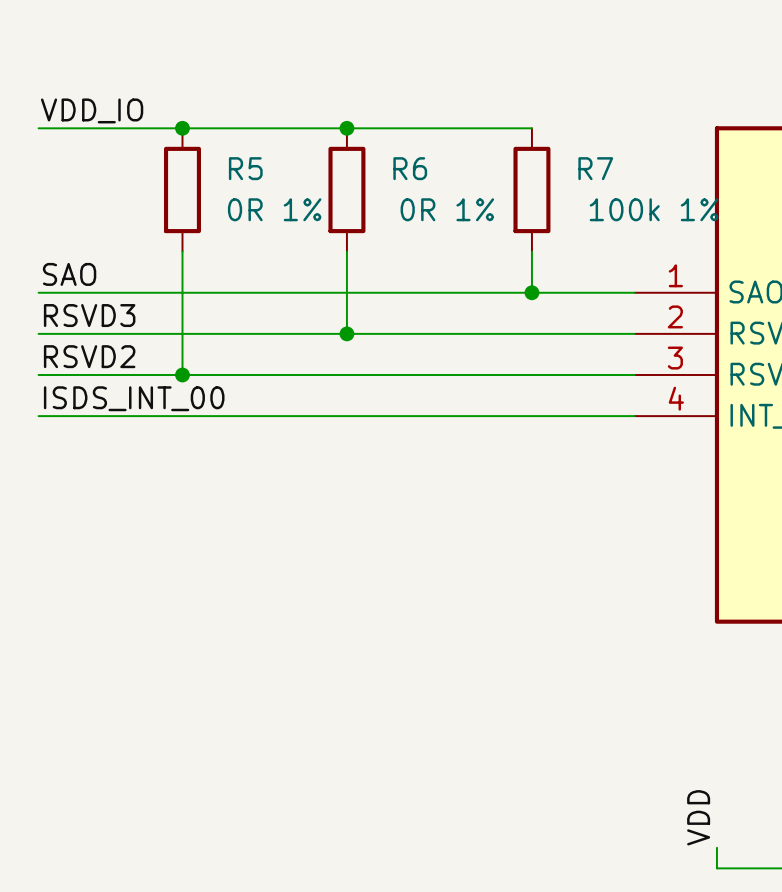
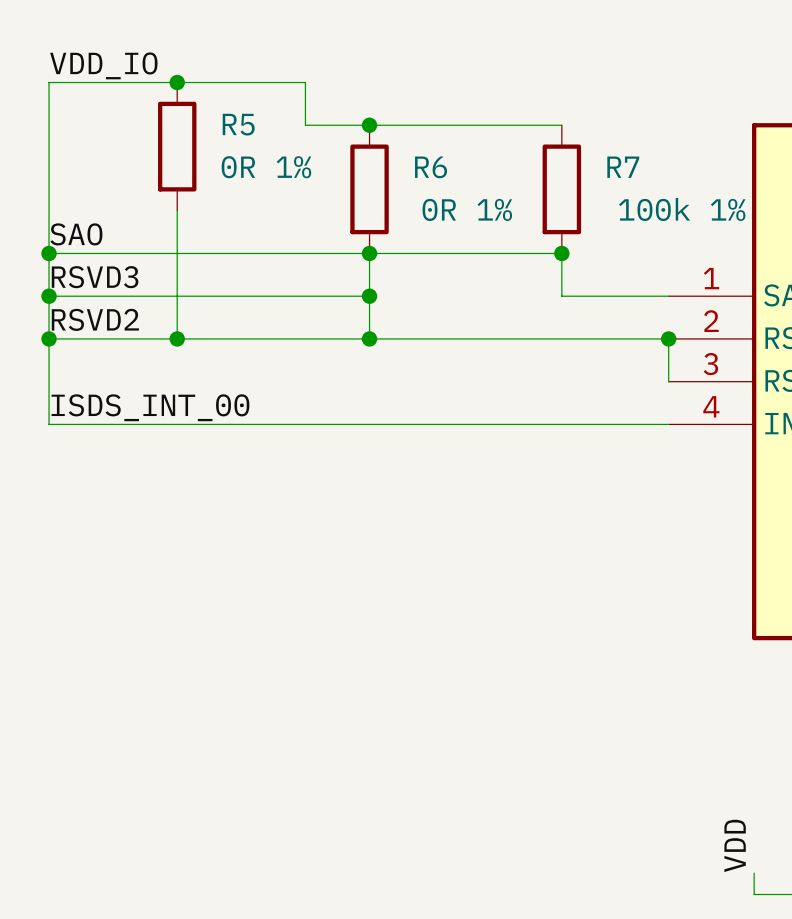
label position: VDD_IO (92, 110) -> VDD_IO (103, 65)
wire: (38, 128) (285, 128) -> (49, 424) (49, 82) (305, 82) (305, 125)
junction position: (182, 128) -> (177, 82)
R5 position: (182, 189) -> (177, 146)
label: none -> SAO (76, 234)
wire: none -> (49, 253) (561, 253)
junction: none -> (49, 253)
wire: (182, 251) (182, 374) -> (177, 210) (177, 338)
junction: none -> (369, 253)
label: SAO (69, 274) -> RSVD3 (95, 277)
junction: none -> (49, 296)
wire: (346, 292) (531, 292) -> none
junction: none -> (369, 296)
junction position: (531, 292) -> (561, 253)
label: RSVD3 (89, 315) -> RSVD2 (95, 319)
junction: none -> (49, 338)
junction: none -> (668, 338)
label: RSVD2 (89, 356) -> none
wire: (38, 374) (634, 374) -> (668, 338) (668, 381)
junction position: (182, 374) -> (177, 338)

